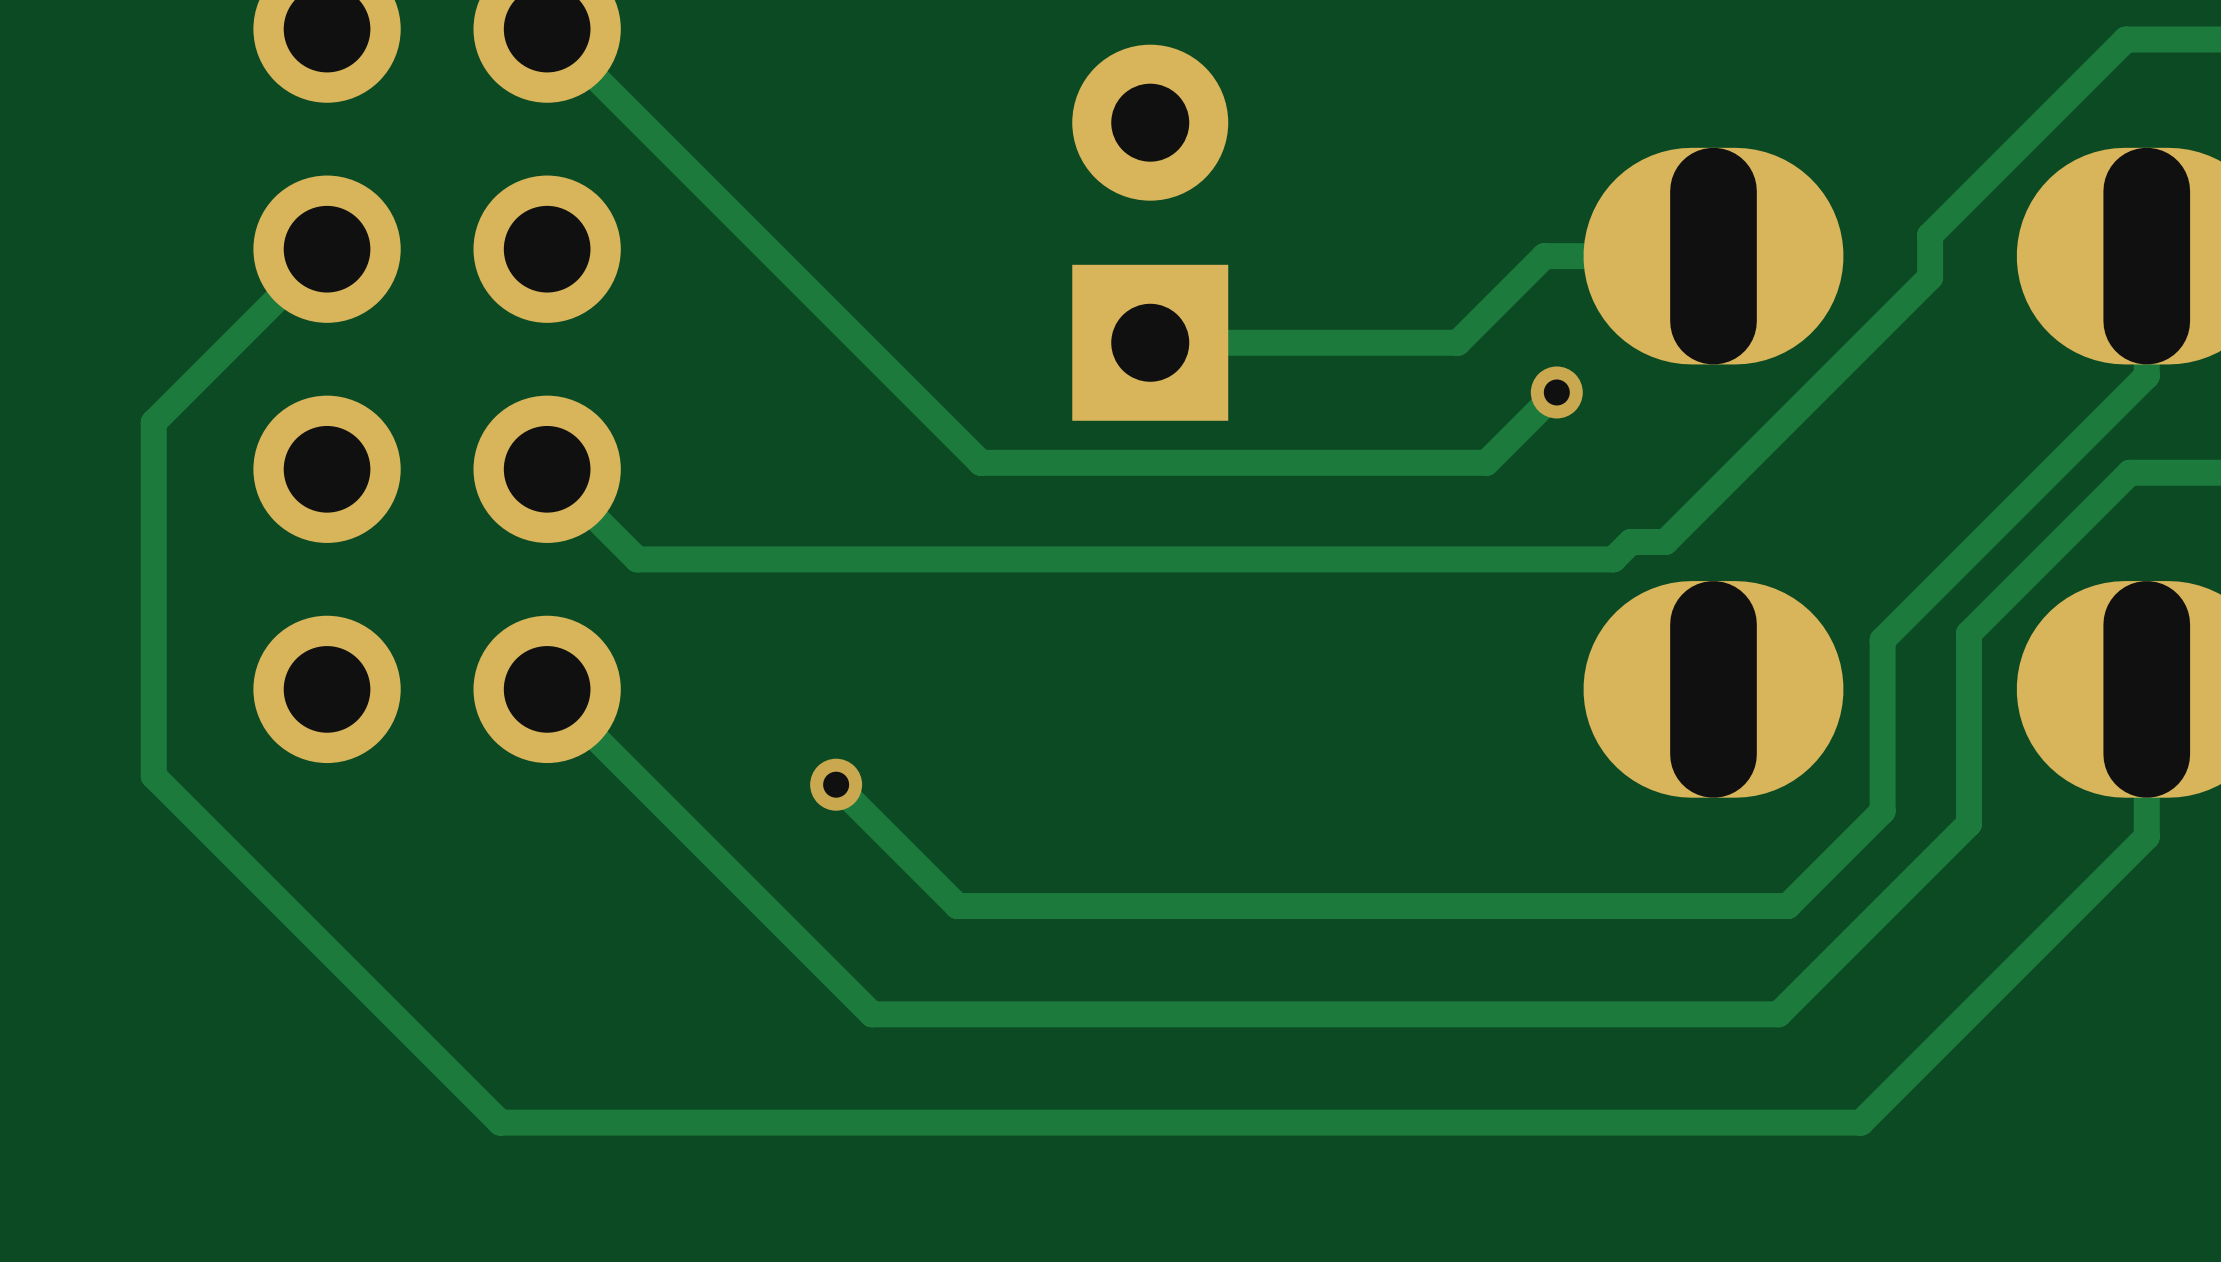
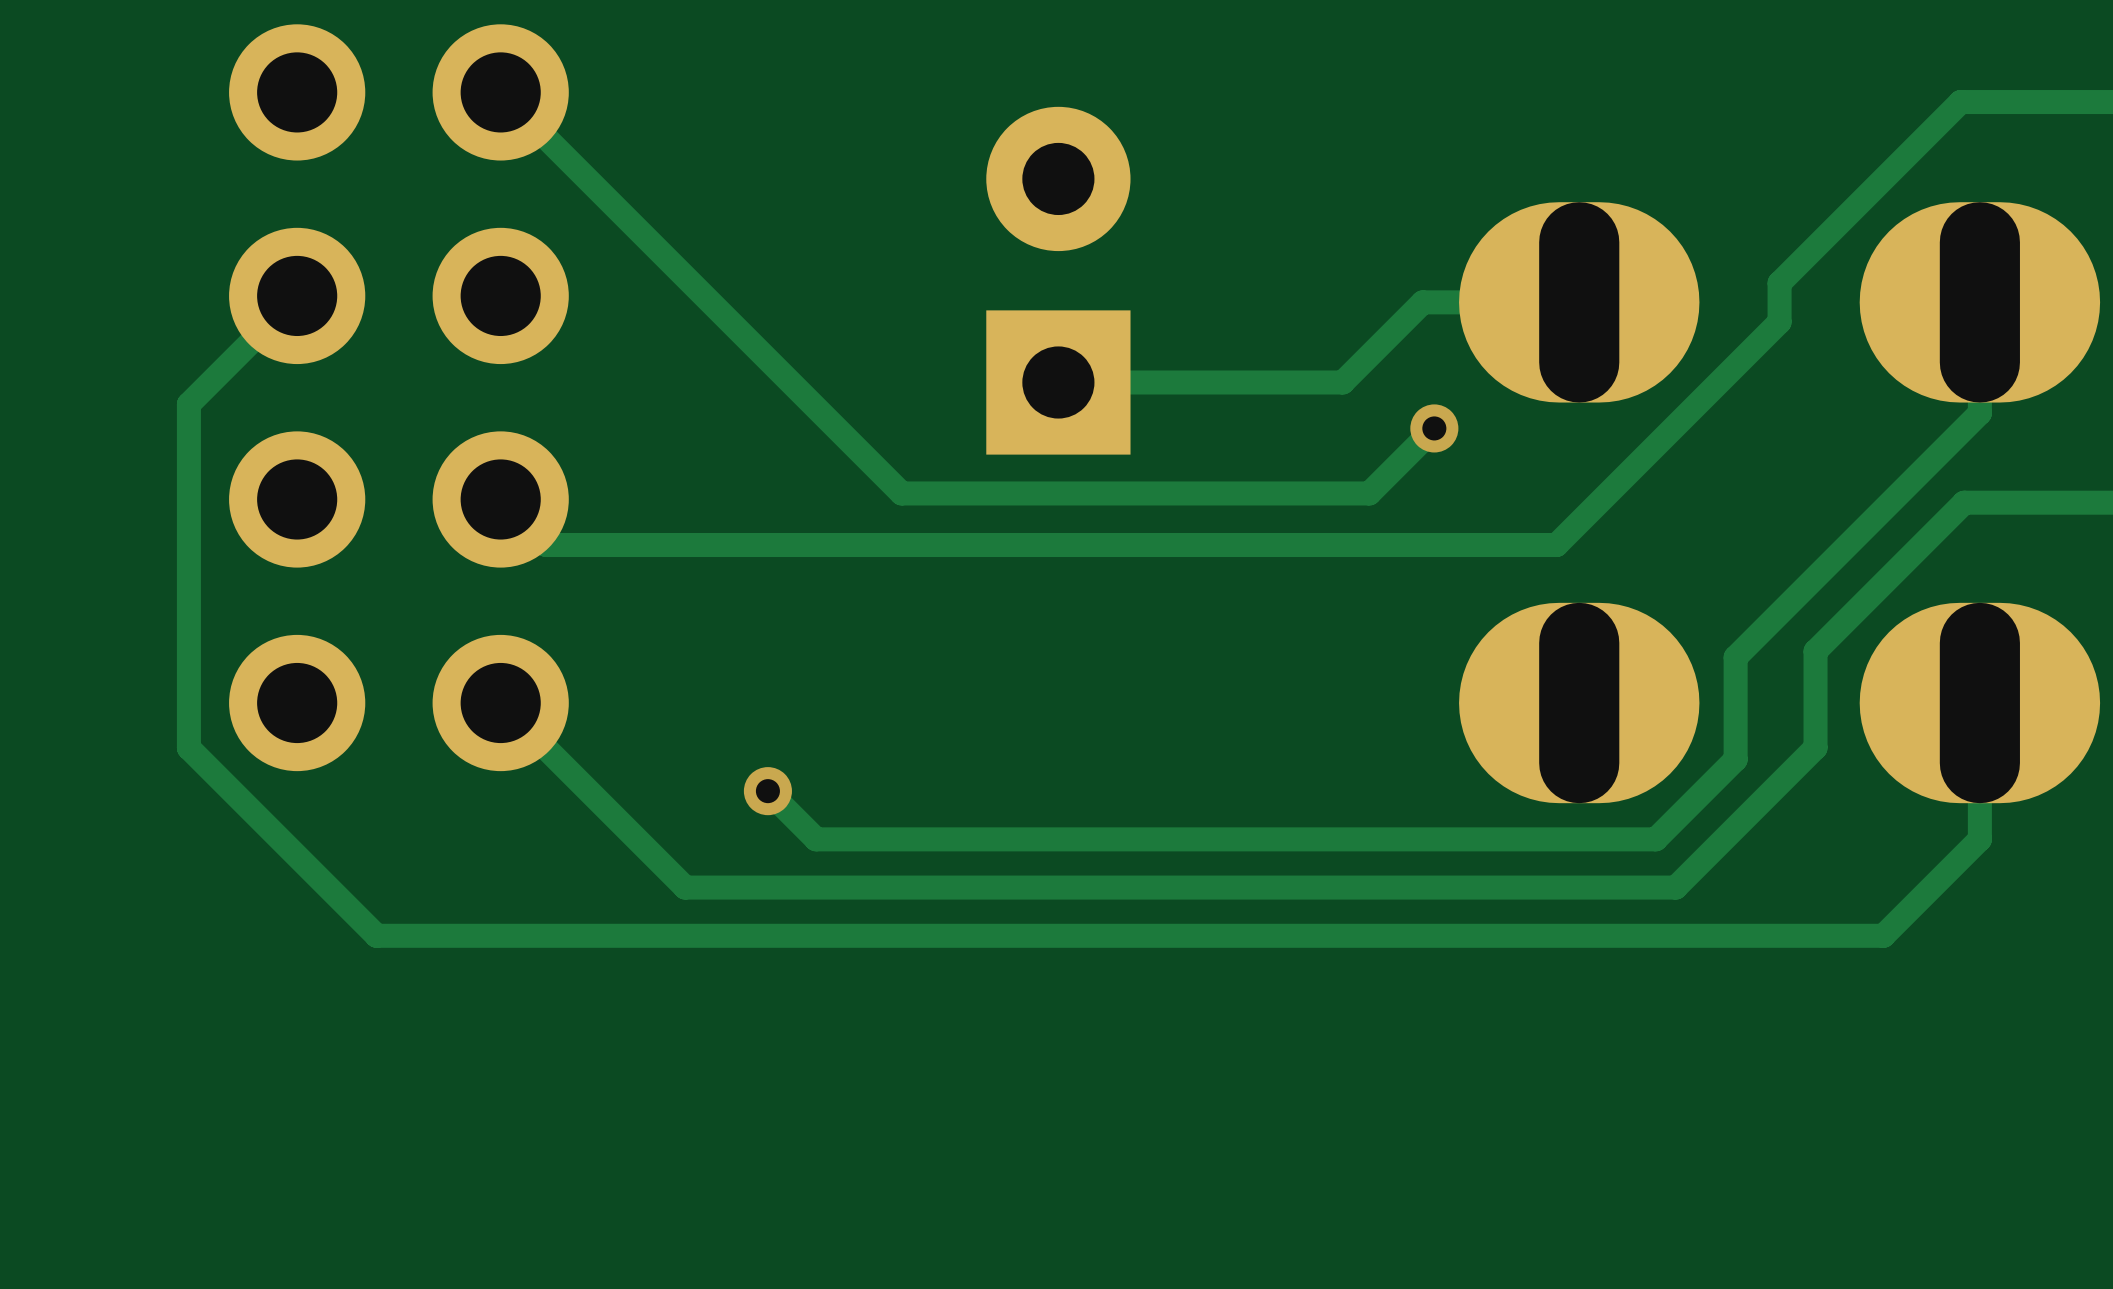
track: (210, 366) (153, 422) (153, 776) (500, 1122) (1860, 1122) (2042, 941) -> (188, 404) (188, 748) (376, 935) (1883, 935)
track: (1688, 518) (1665, 541) (1630, 541) (1613, 559) (637, 559) (596, 518) -> (1556, 545) (546, 545)
track: (1969, 737) (1969, 823) (1778, 1014) (872, 1014) (746, 888) -> (1815, 747) (1675, 887) (685, 887)
track: (1882, 750) (1882, 811) (1787, 906) (957, 906) (888, 836) -> (1735, 759) (1655, 839) (816, 839)

